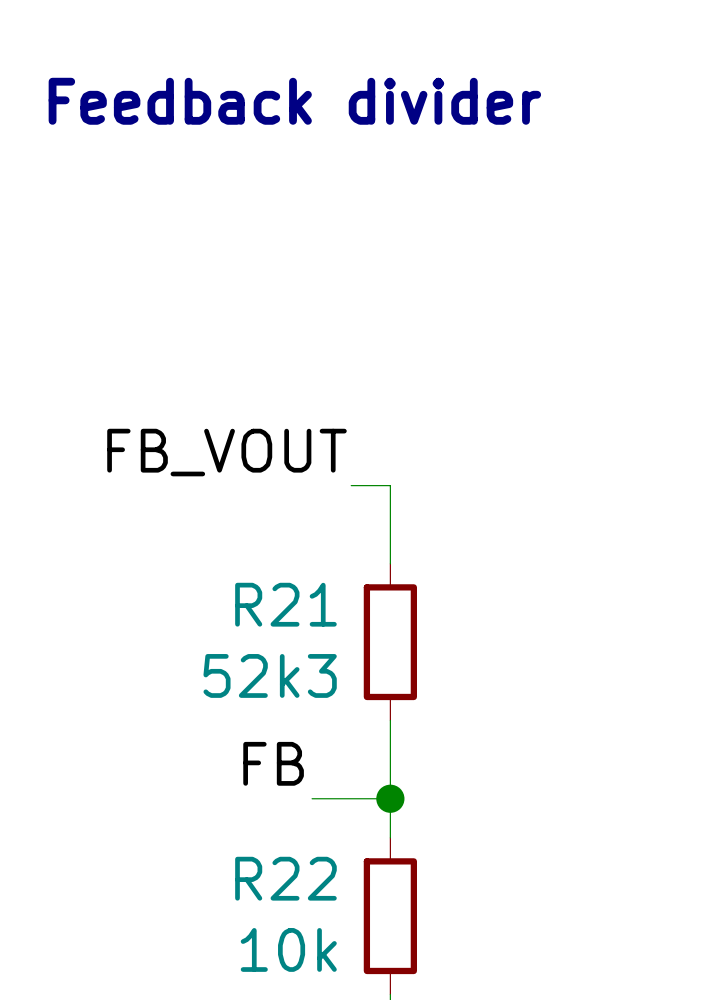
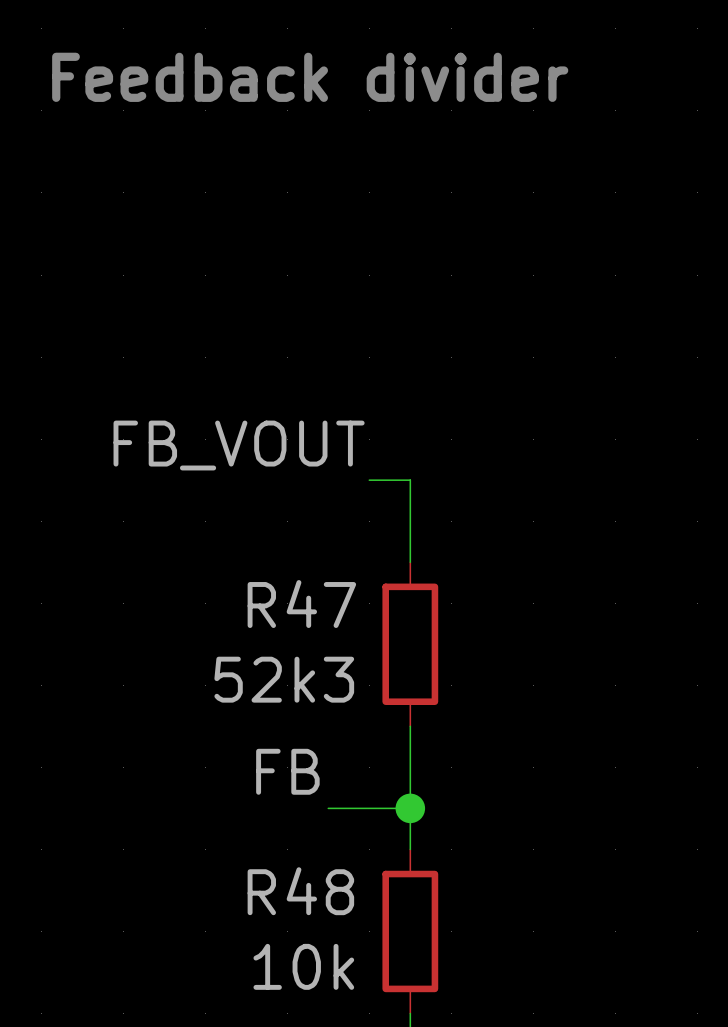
R21 name: R21 (285, 604) -> R47 (301, 604)
R22 name: R22 (285, 878) -> R48 (300, 891)

